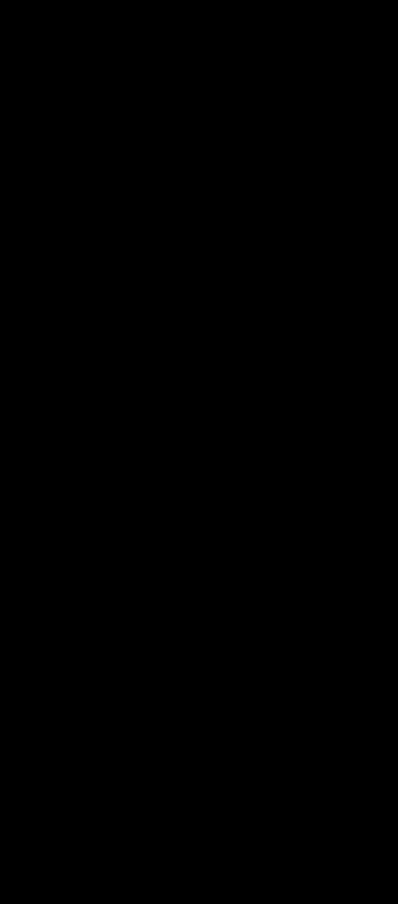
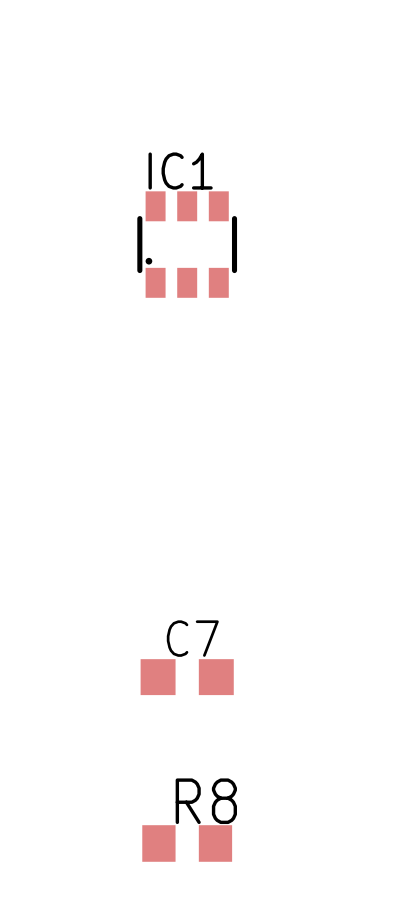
IC1: none -> (187, 244)
C7: none -> (187, 677)
R8: none -> (187, 843)

